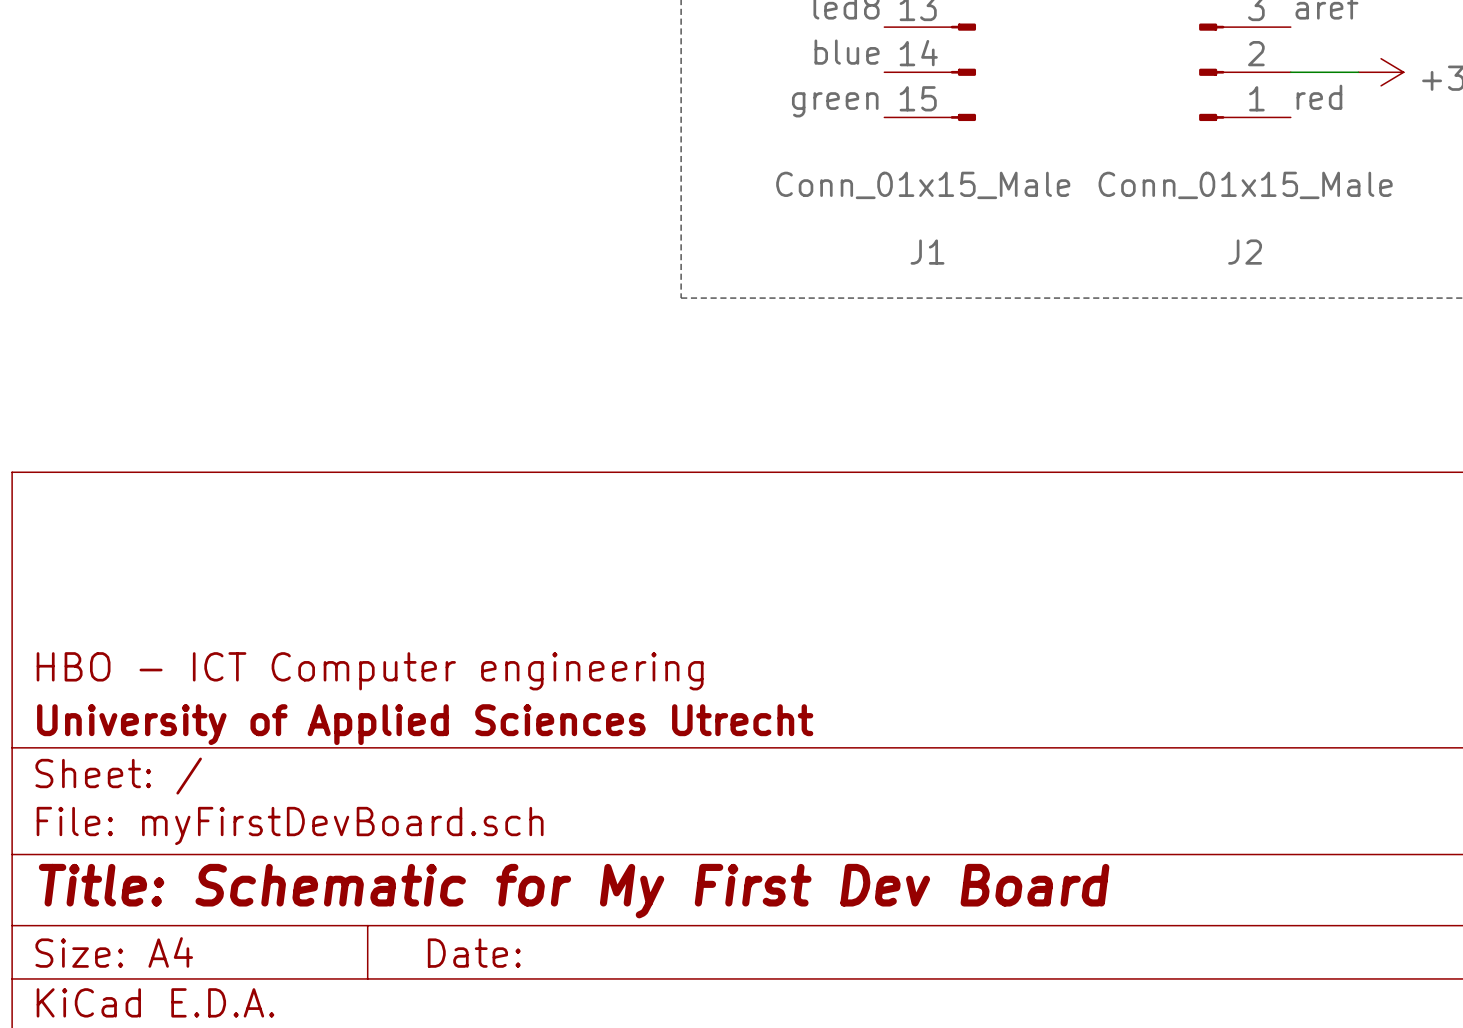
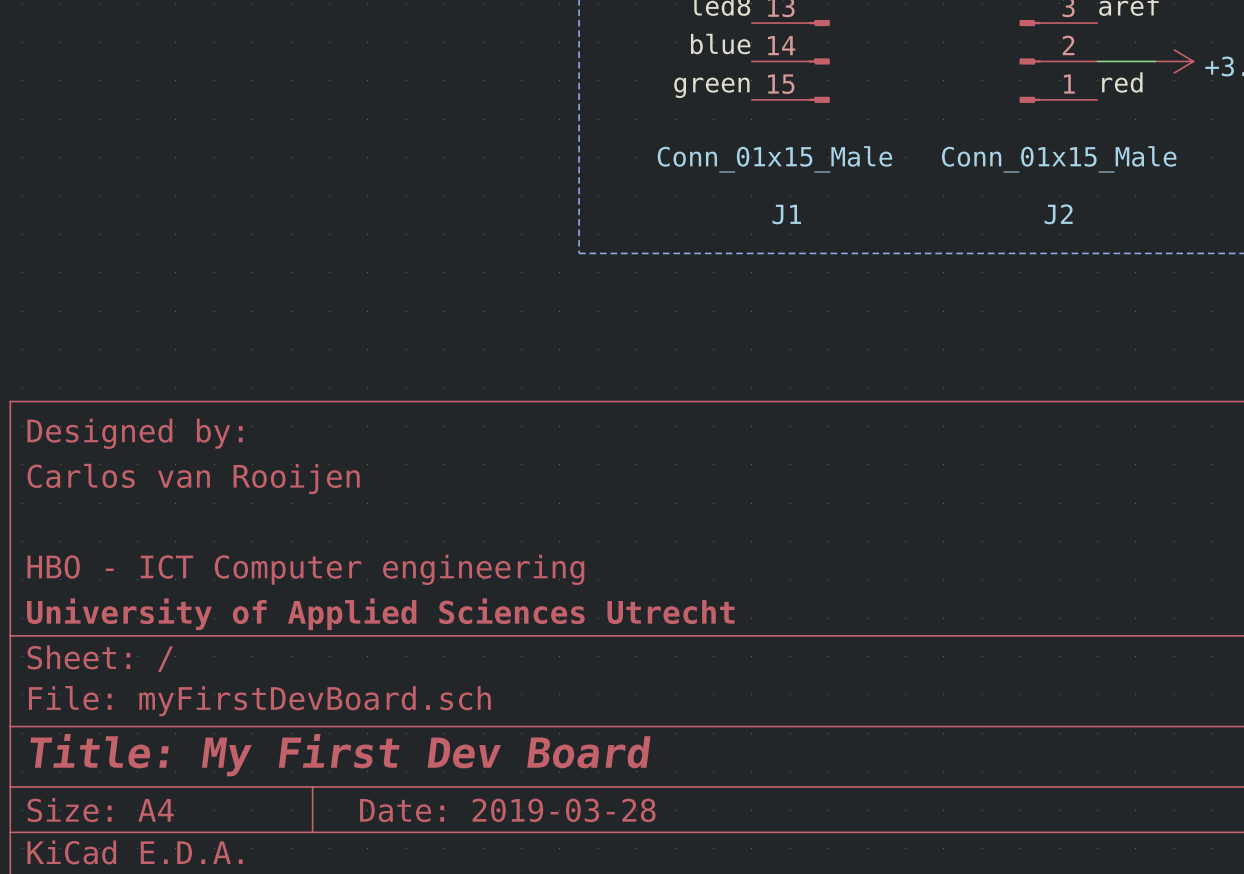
title block: none -> Designed by: (135, 433)
title block: none -> Carlos van Rooijen (193, 478)
title block: Title: Schematic for My First Dev Board (574, 891) -> Title: My First Dev Board (340, 755)
title block: Date: (474, 953) -> Date: 2019-03-28 (507, 810)

